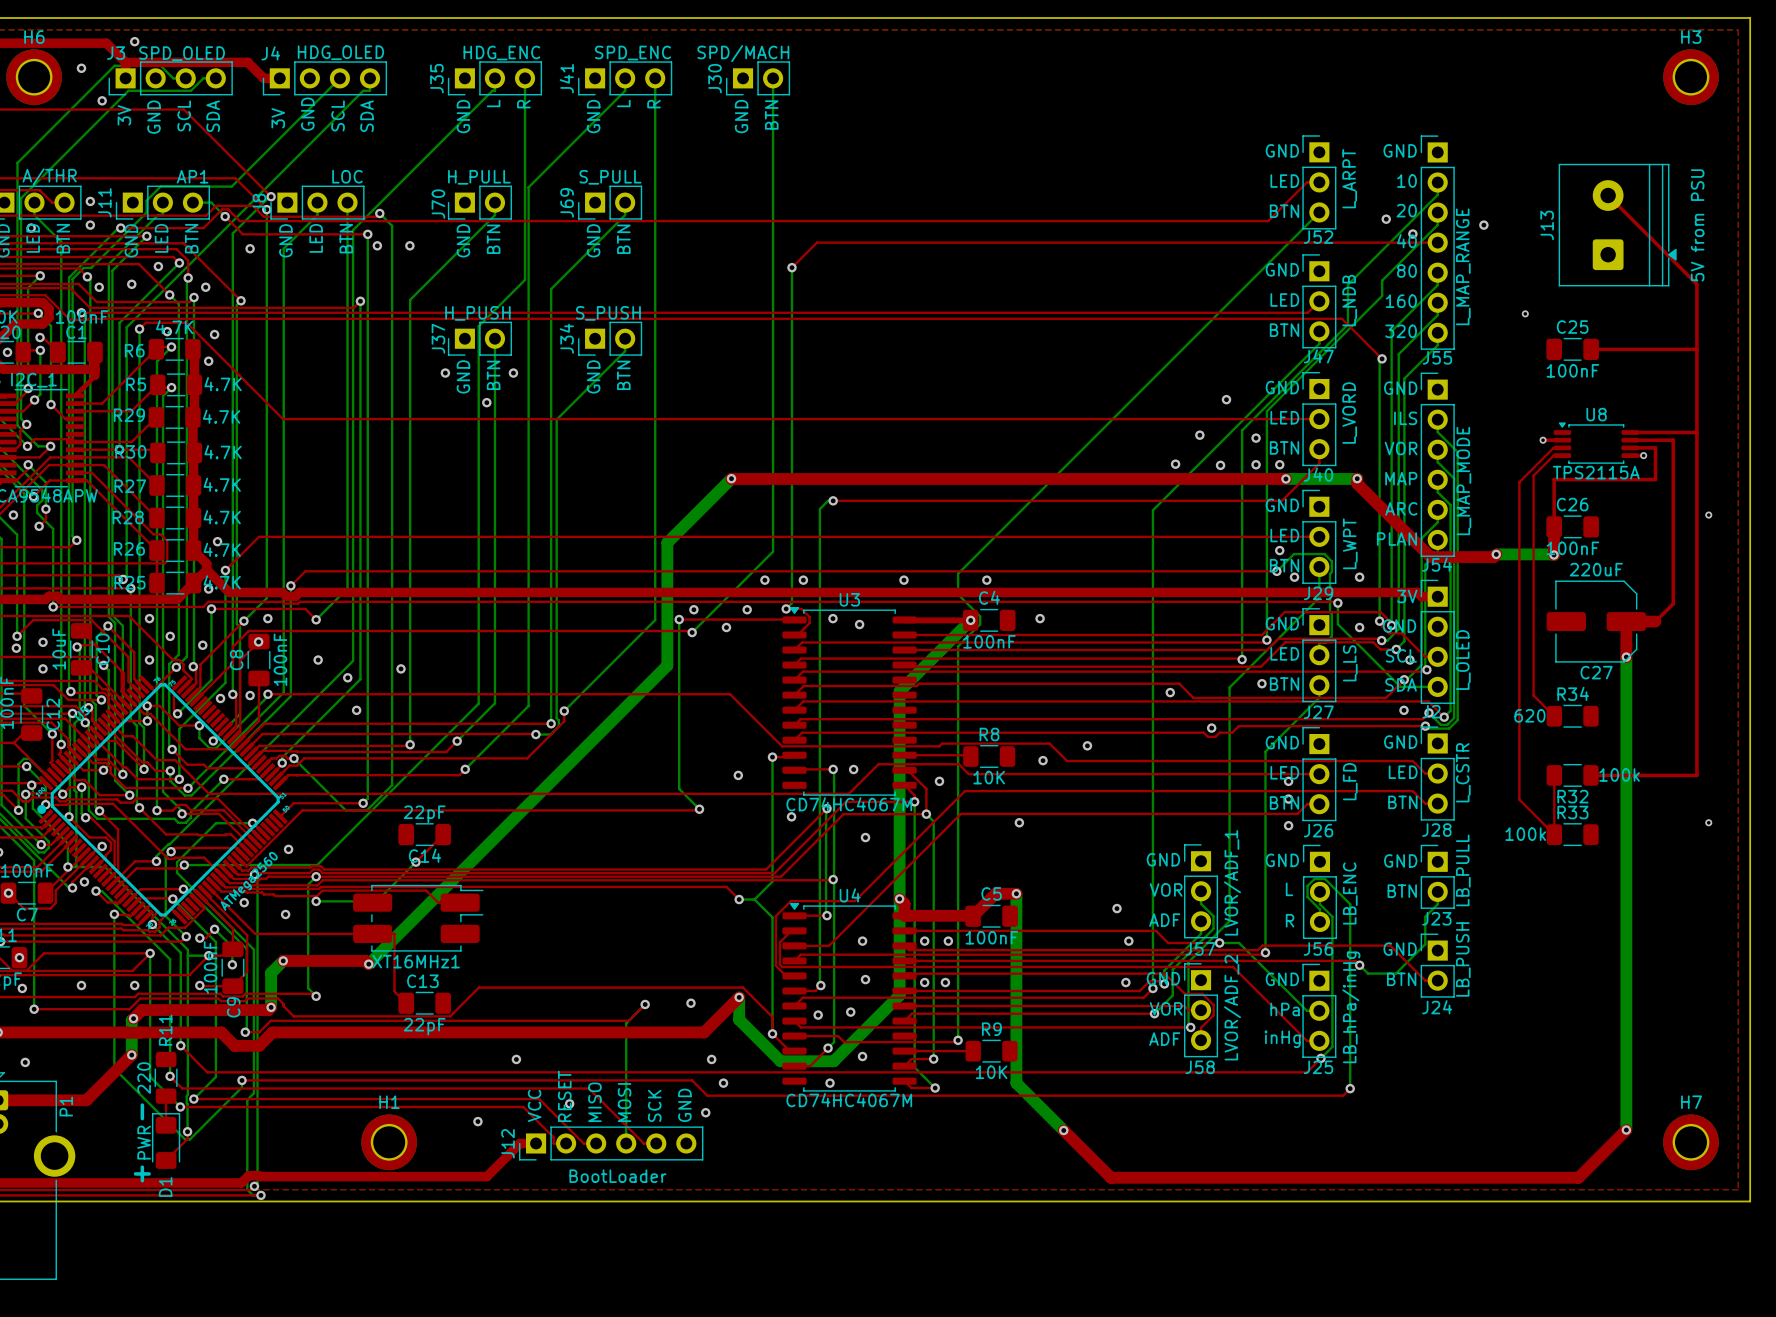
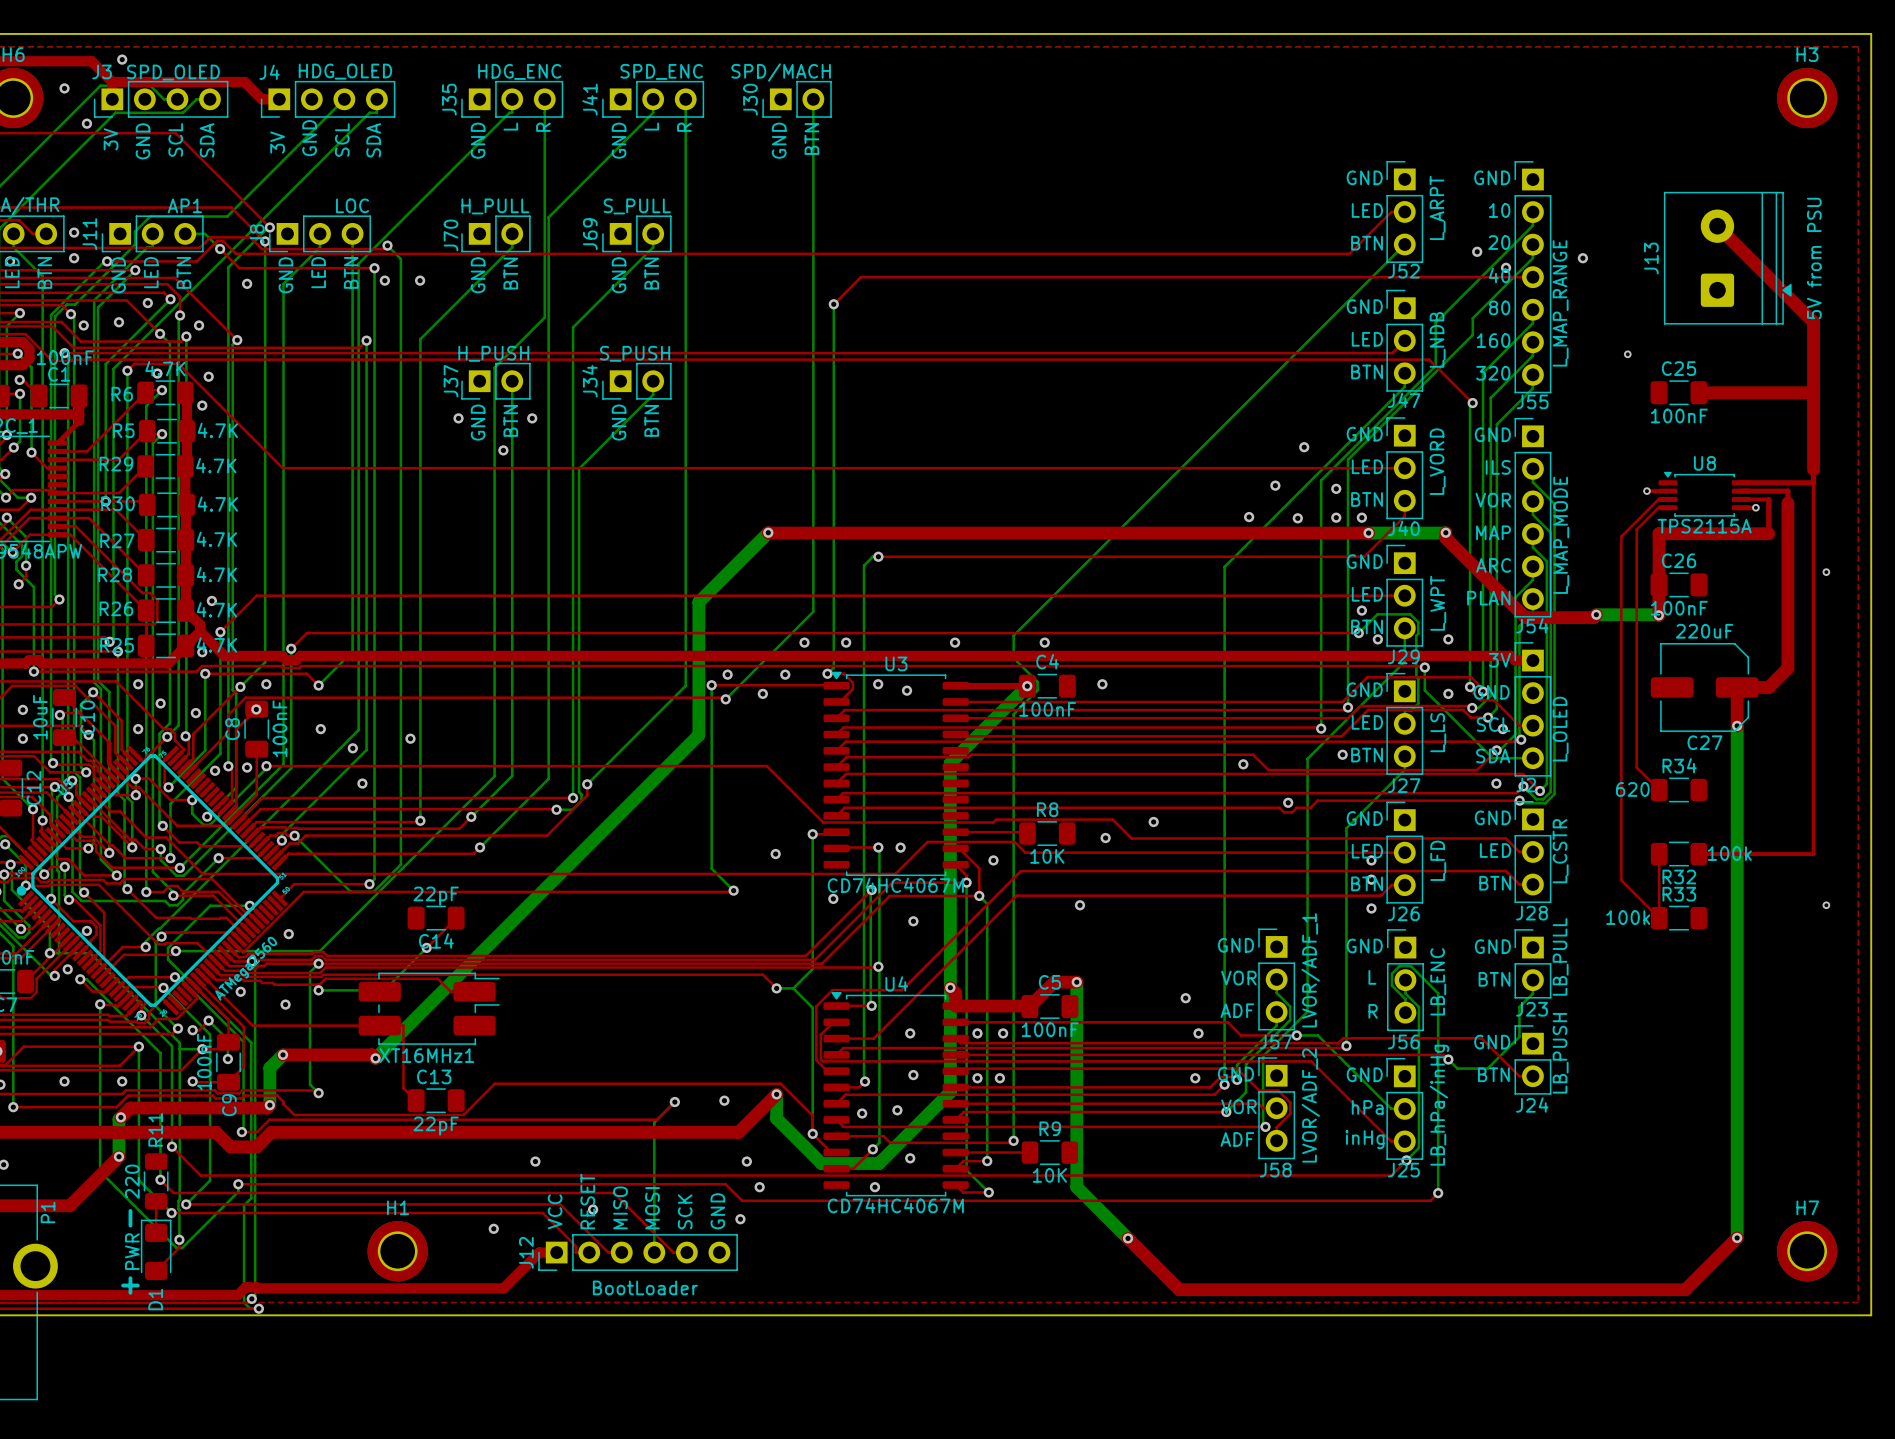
top track width: thin (1608, 195) (1696, 284) (1696, 432) (1630, 432) -> thick (1717, 226) (1813, 322) (1813, 482) (1741, 482)
top track width: thin (1596, 349) (1696, 349) -> thick (1704, 392) (1813, 392)
top track width: thin (1630, 440) (1673, 440) (1673, 603) (1655, 621) -> thick (1741, 491) (1787, 491) (1787, 668) (1768, 687)
top track width: thin (1655, 447) (1655, 479) (1554, 479) (1554, 526) -> thick (1768, 499) (1768, 533) (1658, 533) (1658, 584)

